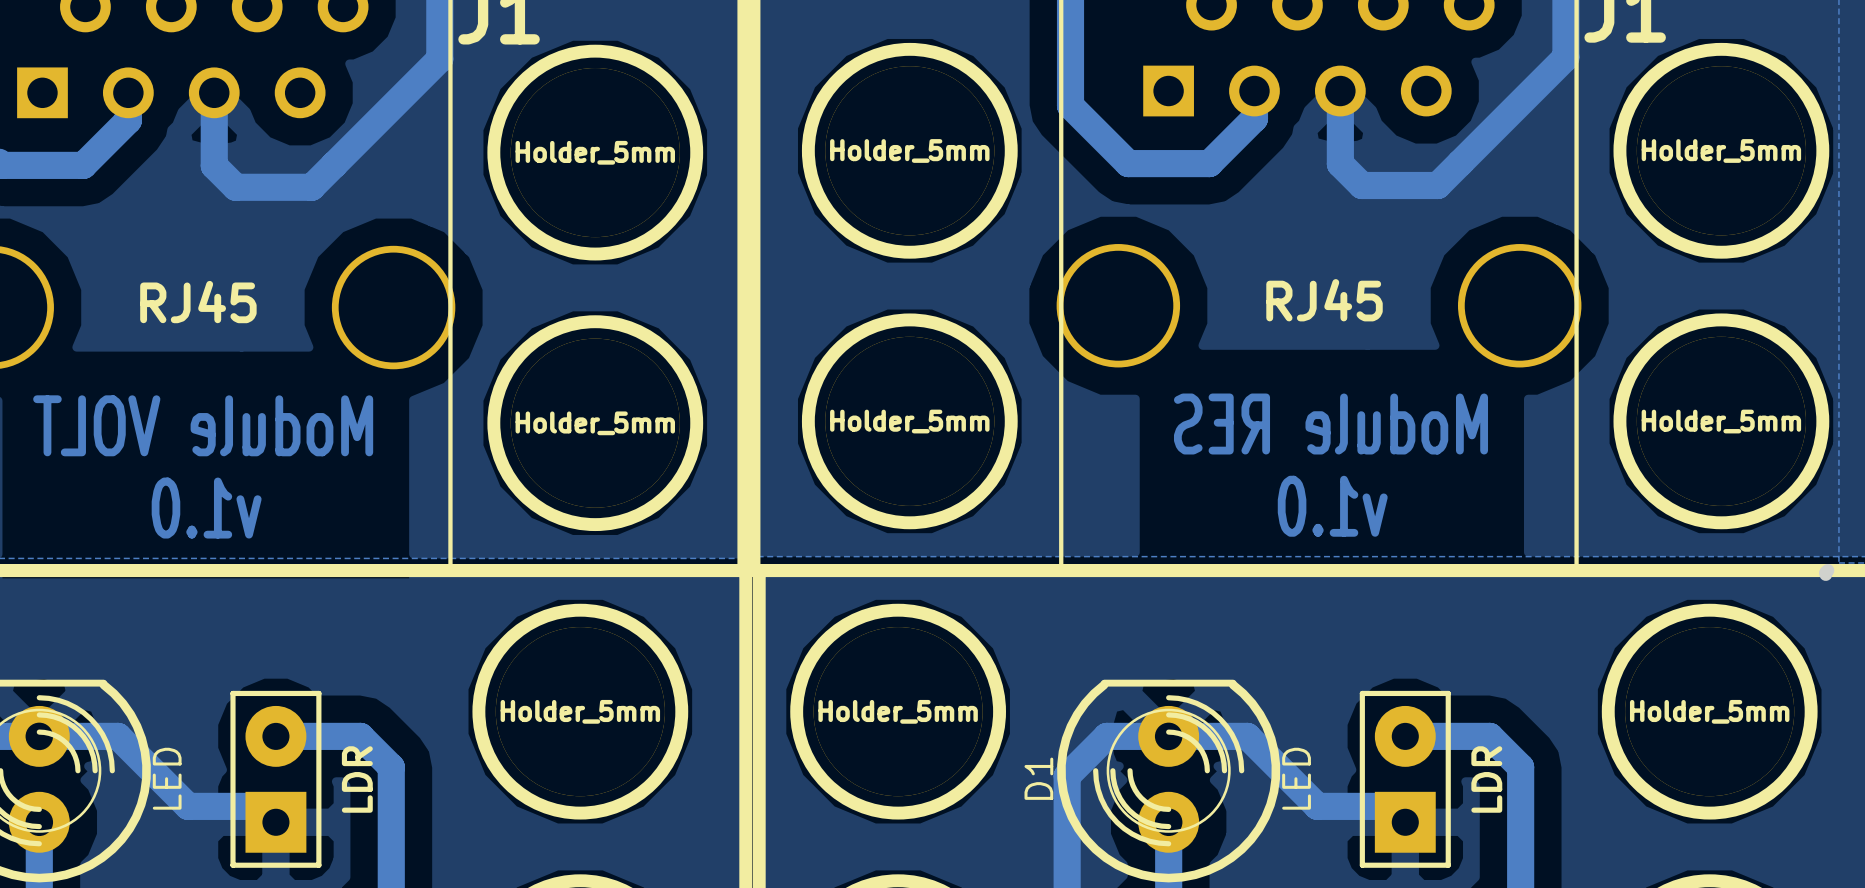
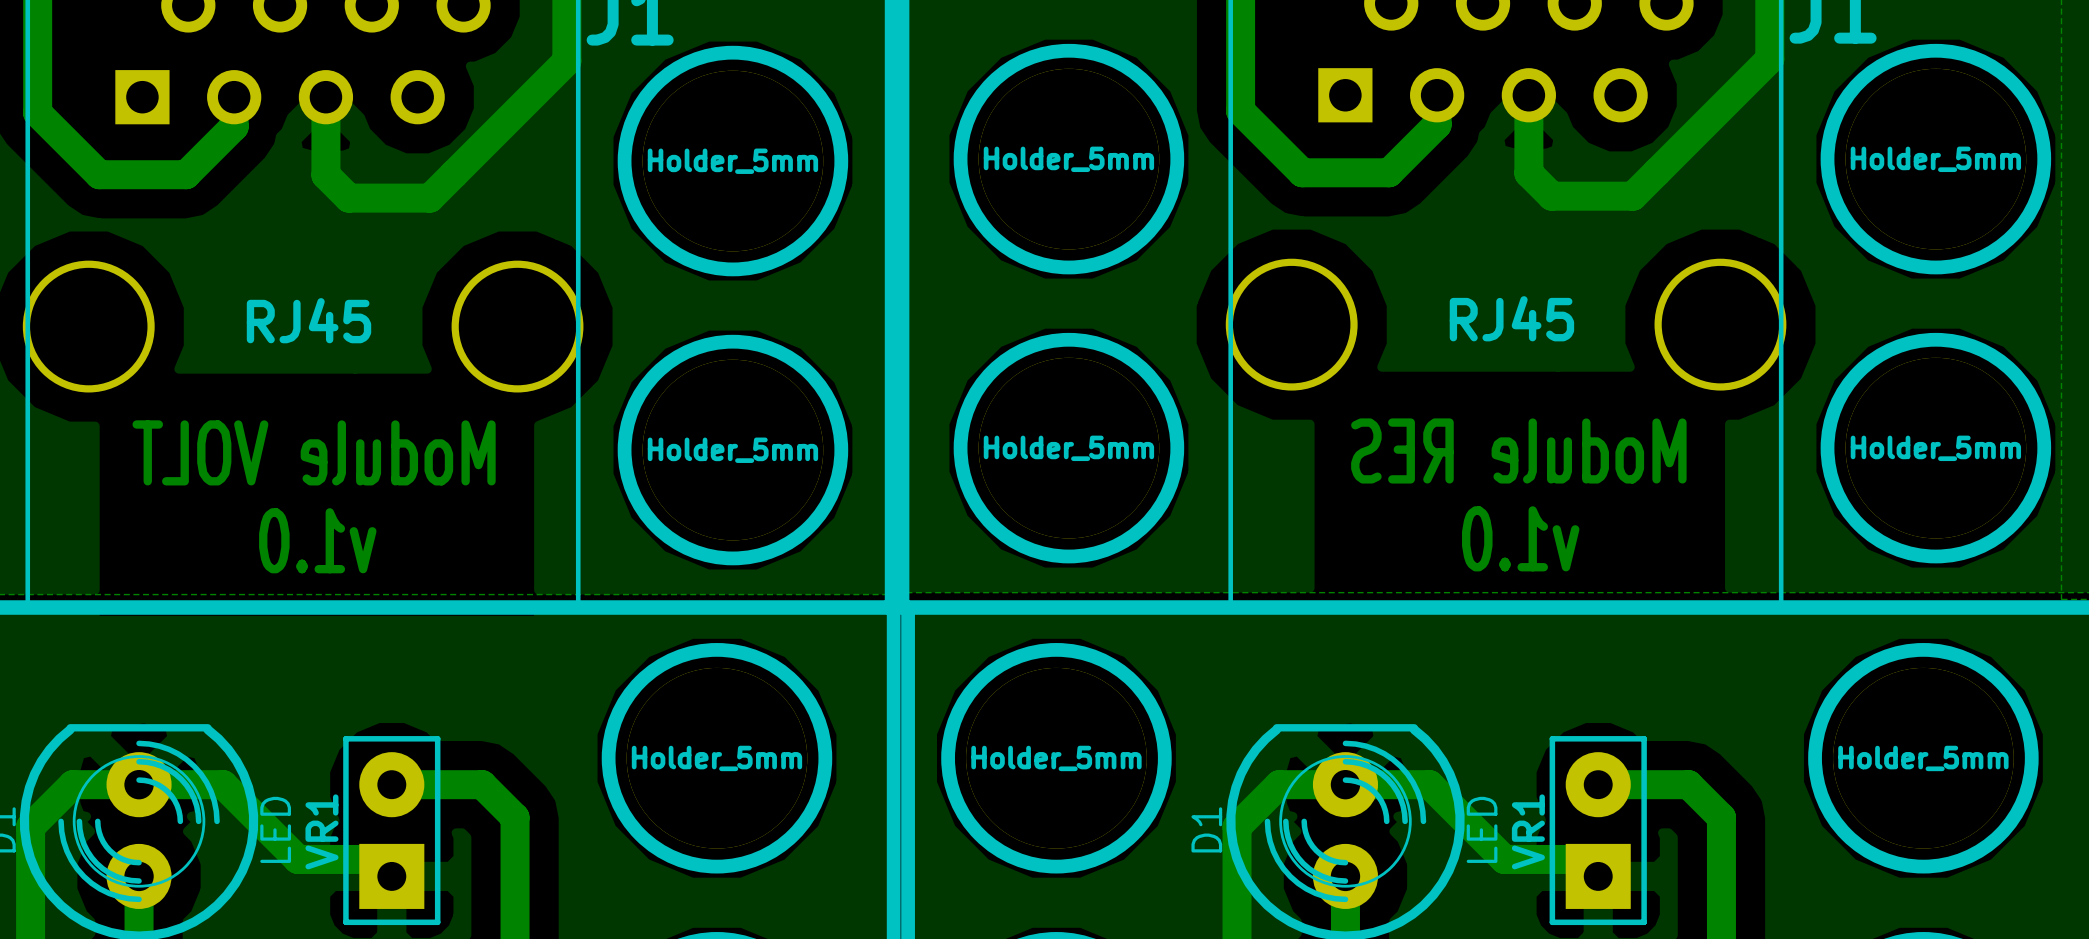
board edge: (1827, 570) (1825, 574) -> none
VR1 value: LDR (357, 779) -> none
VR1 value: LDR (1486, 779) -> none
VR1 name: none -> VR1 (321, 831)
VR1 name: none -> VR1 (1528, 831)

